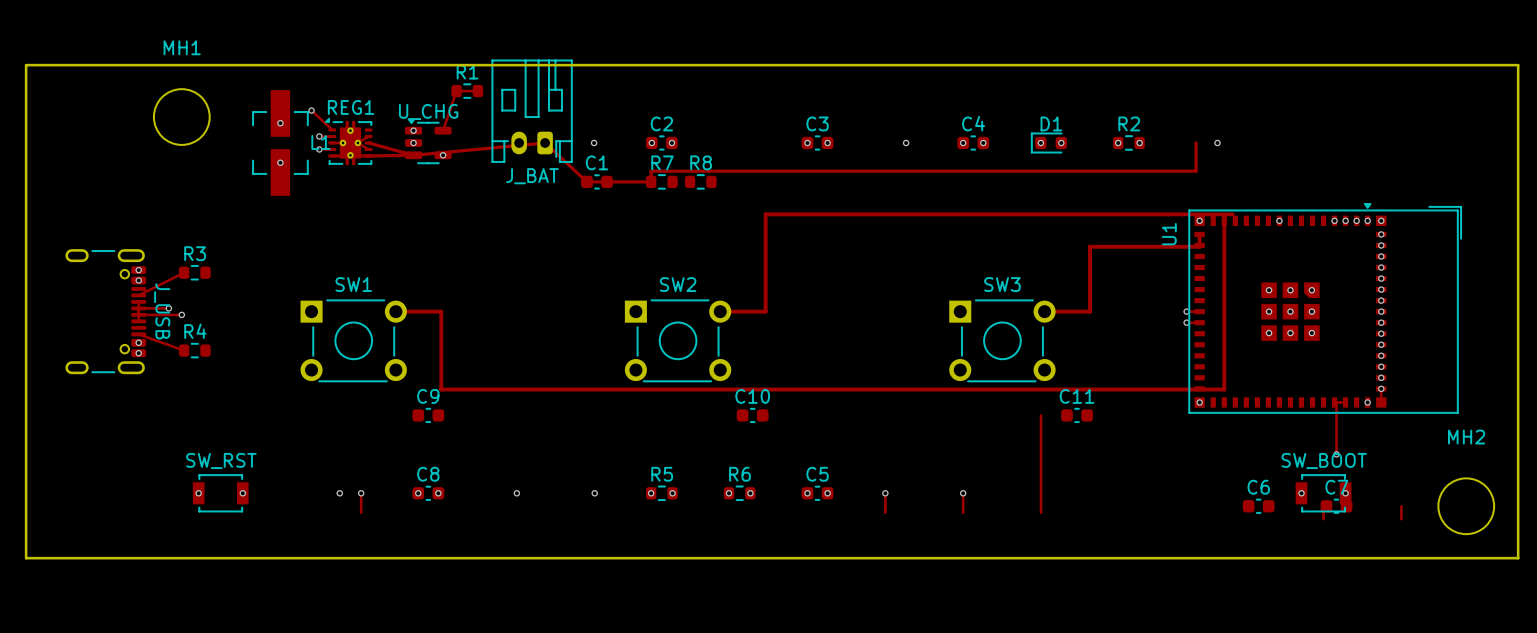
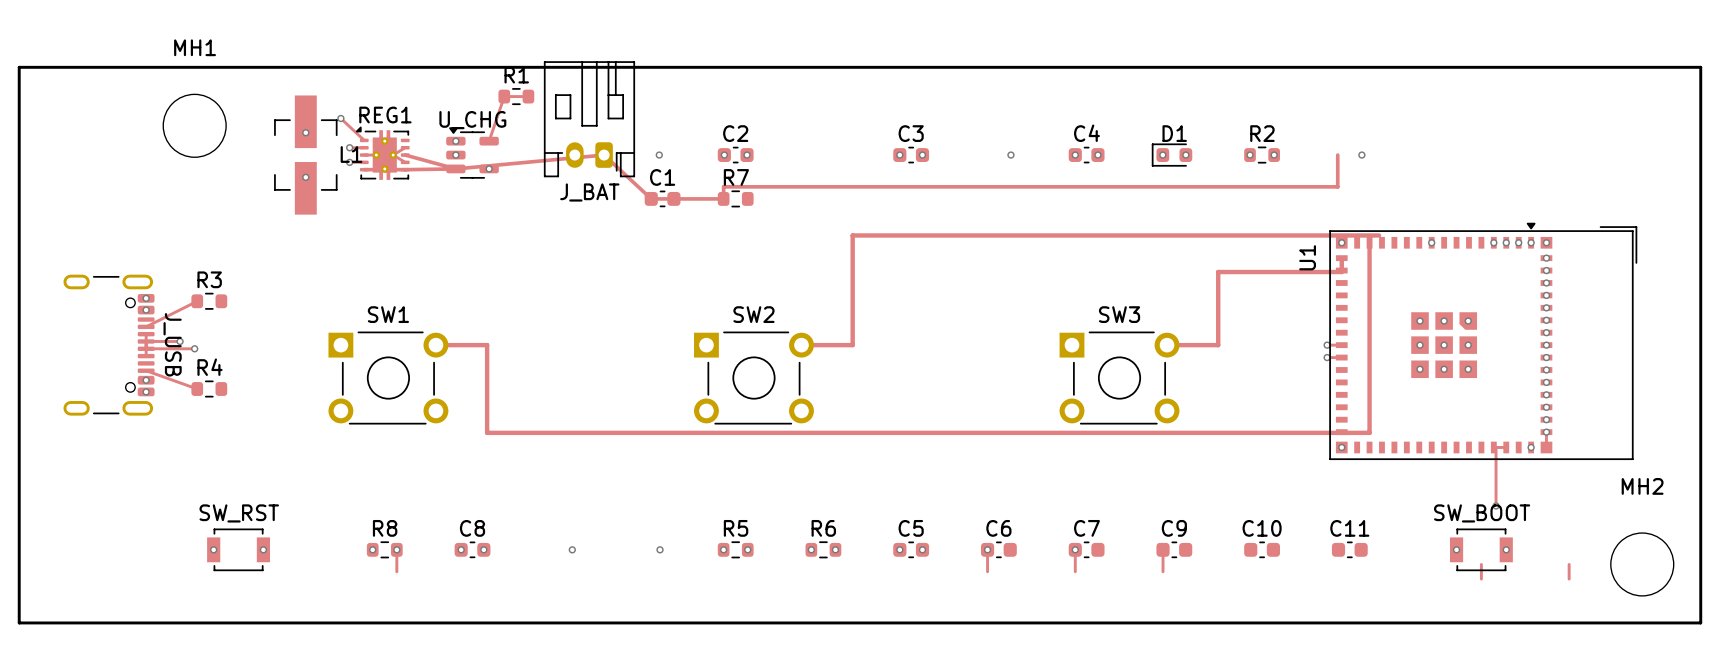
R8 position: (700, 181) -> (384, 549)
C9 position: (428, 415) -> (1174, 549)
C10 position: (752, 415) -> (1262, 549)
track: (1041, 415) (1041, 493) -> none
C11 position: (1077, 415) -> (1349, 549)
C6 position: (1258, 506) -> (998, 549)
C7 position: (1336, 506) -> (1086, 549)

